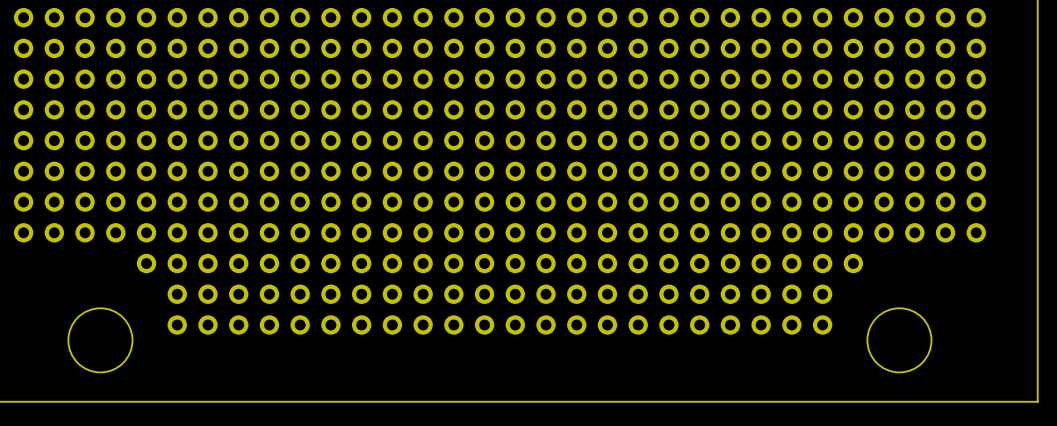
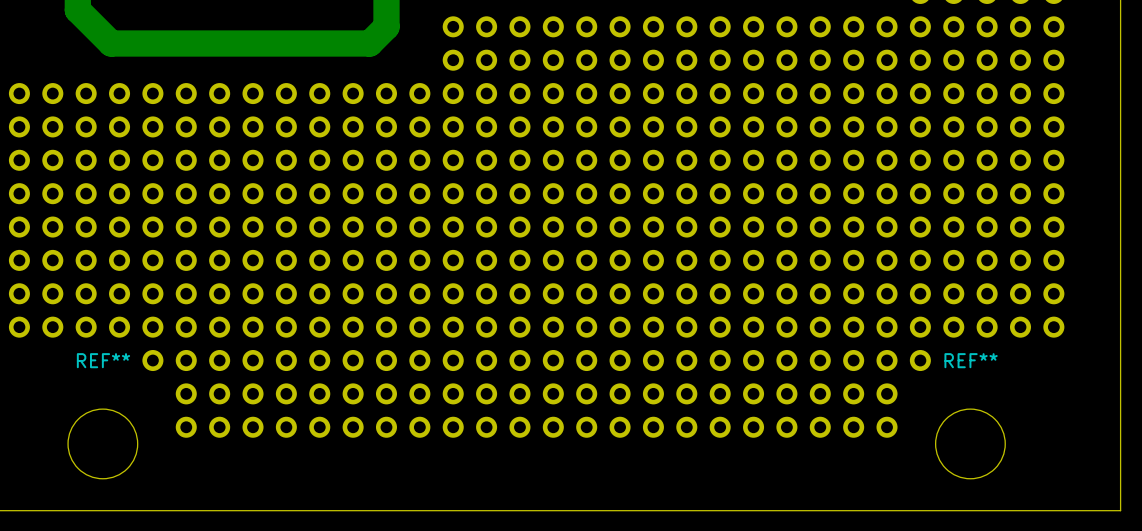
REF** name: none -> REF** (103, 360)
REF** name: none -> REF** (971, 360)

